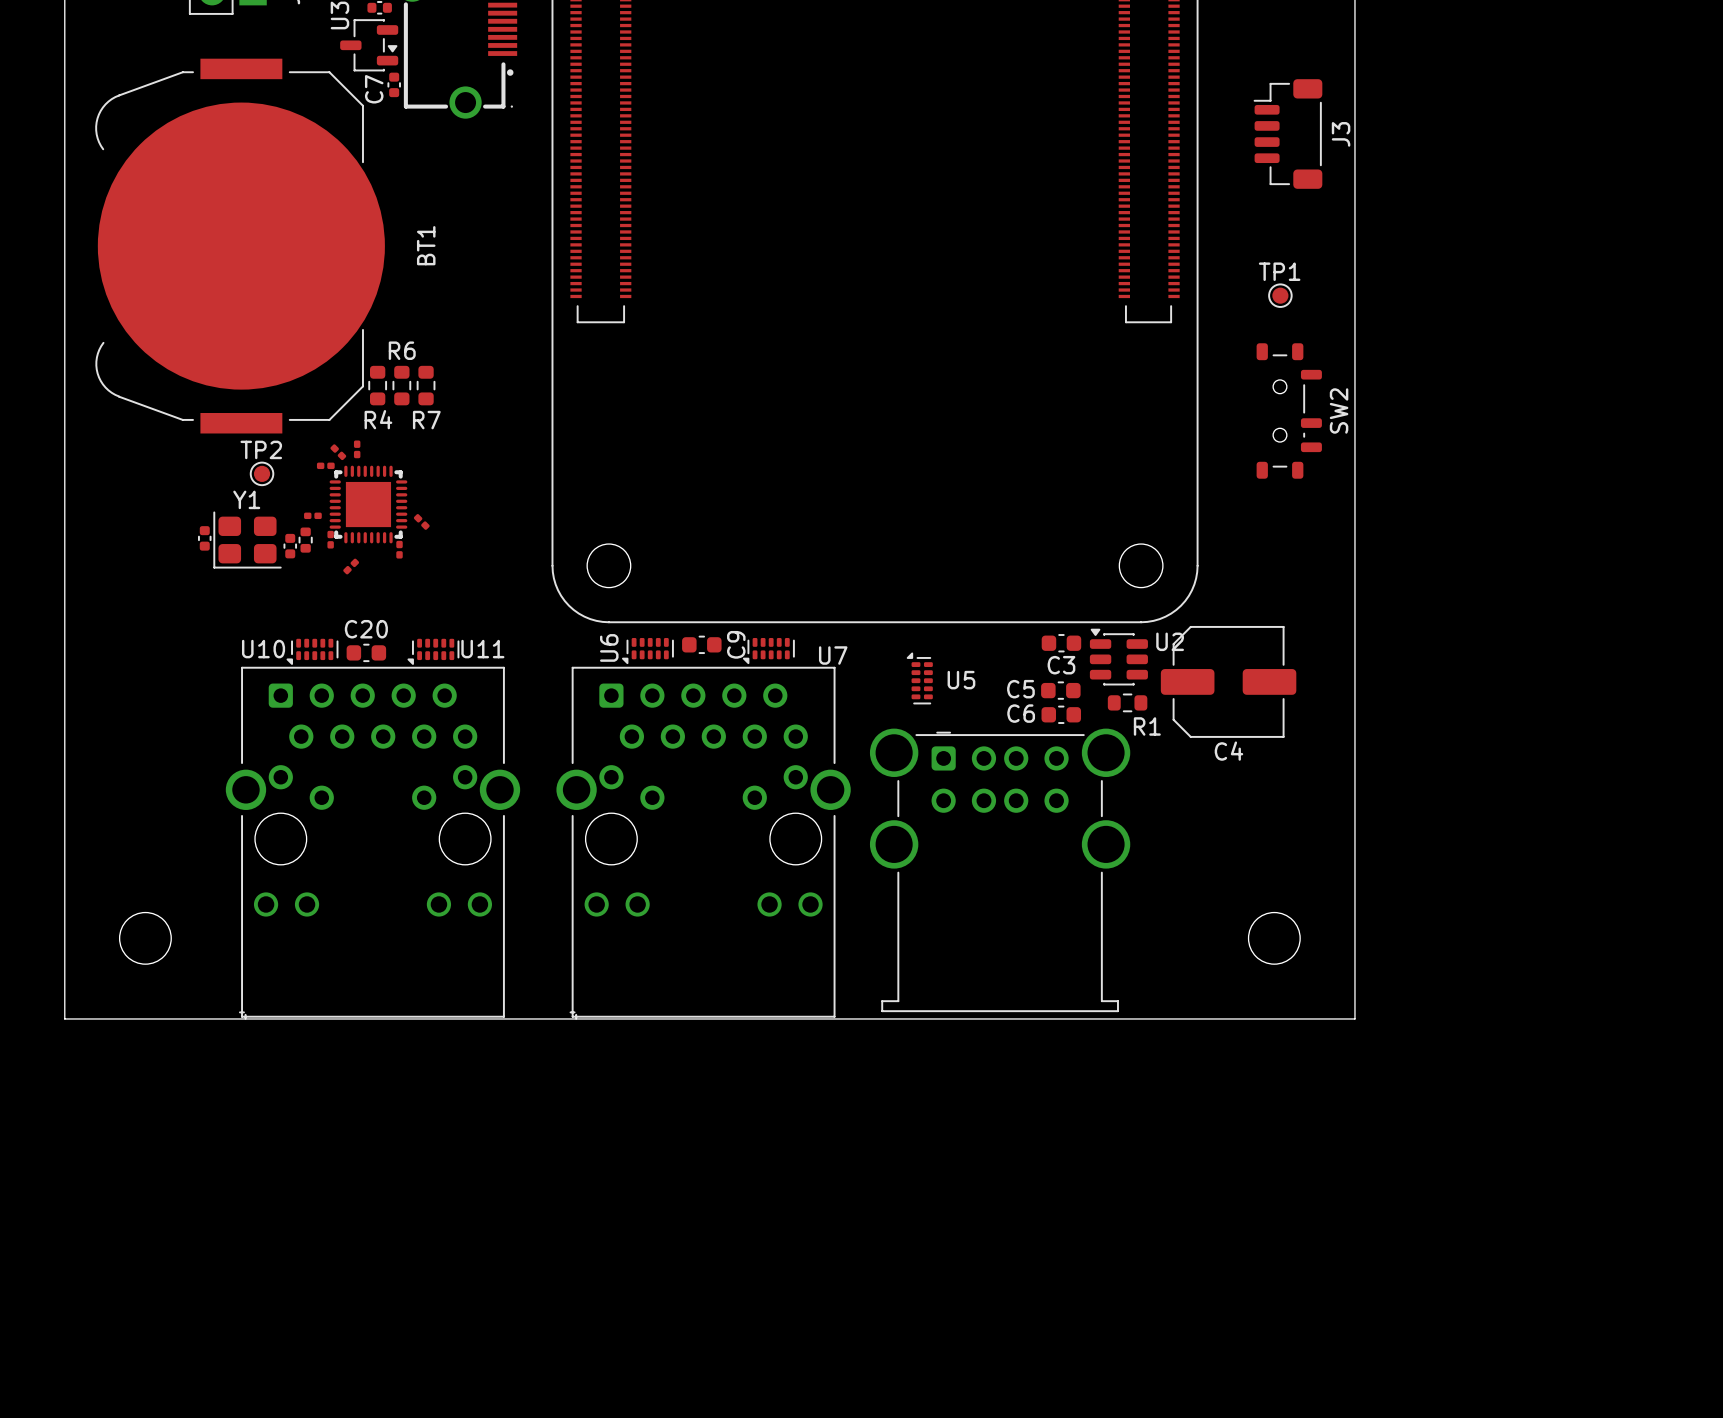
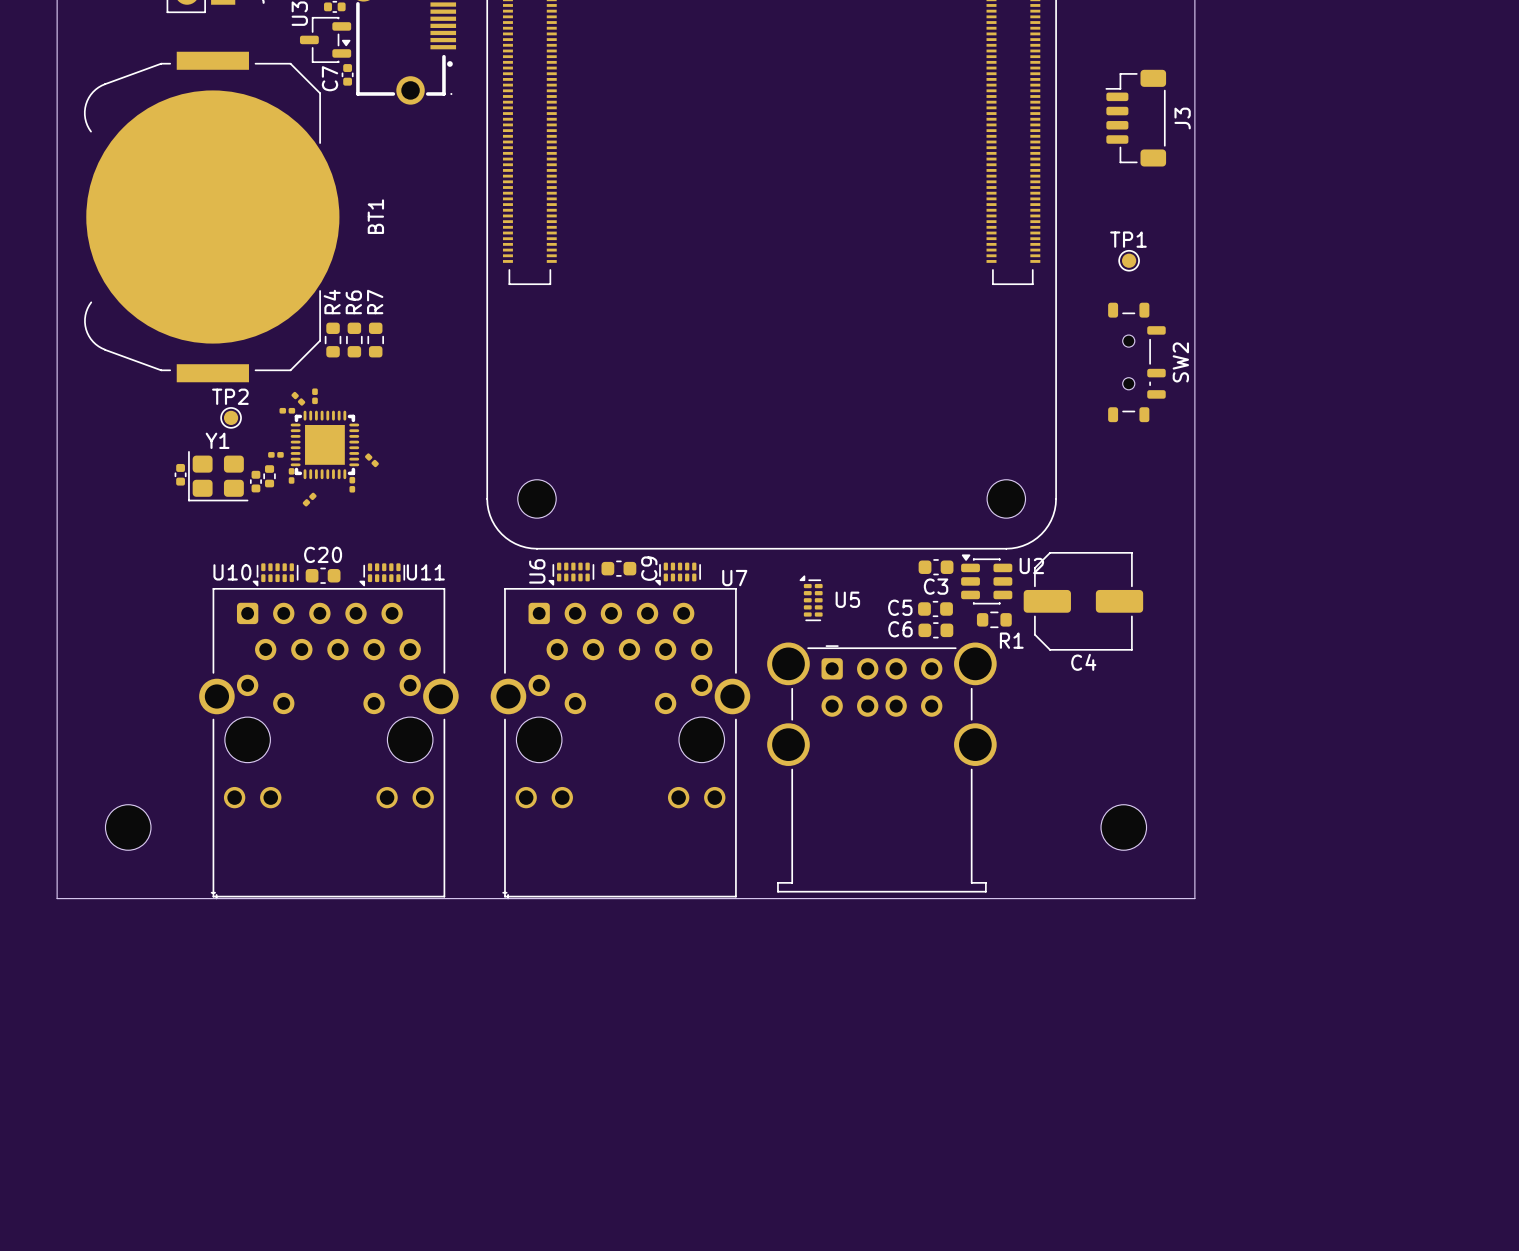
R6 name rotation: 0° (402, 350) -> 90° counterclockwise (353, 302)
R4 name rotation: 0° (378, 419) -> 90° counterclockwise (332, 302)
R4 name position: R4 (378, 419) -> R4 (332, 302)
R7 name rotation: 0° (426, 420) -> 90° counterclockwise (375, 302)
R7 name position: R7 (426, 420) -> R7 (375, 302)

